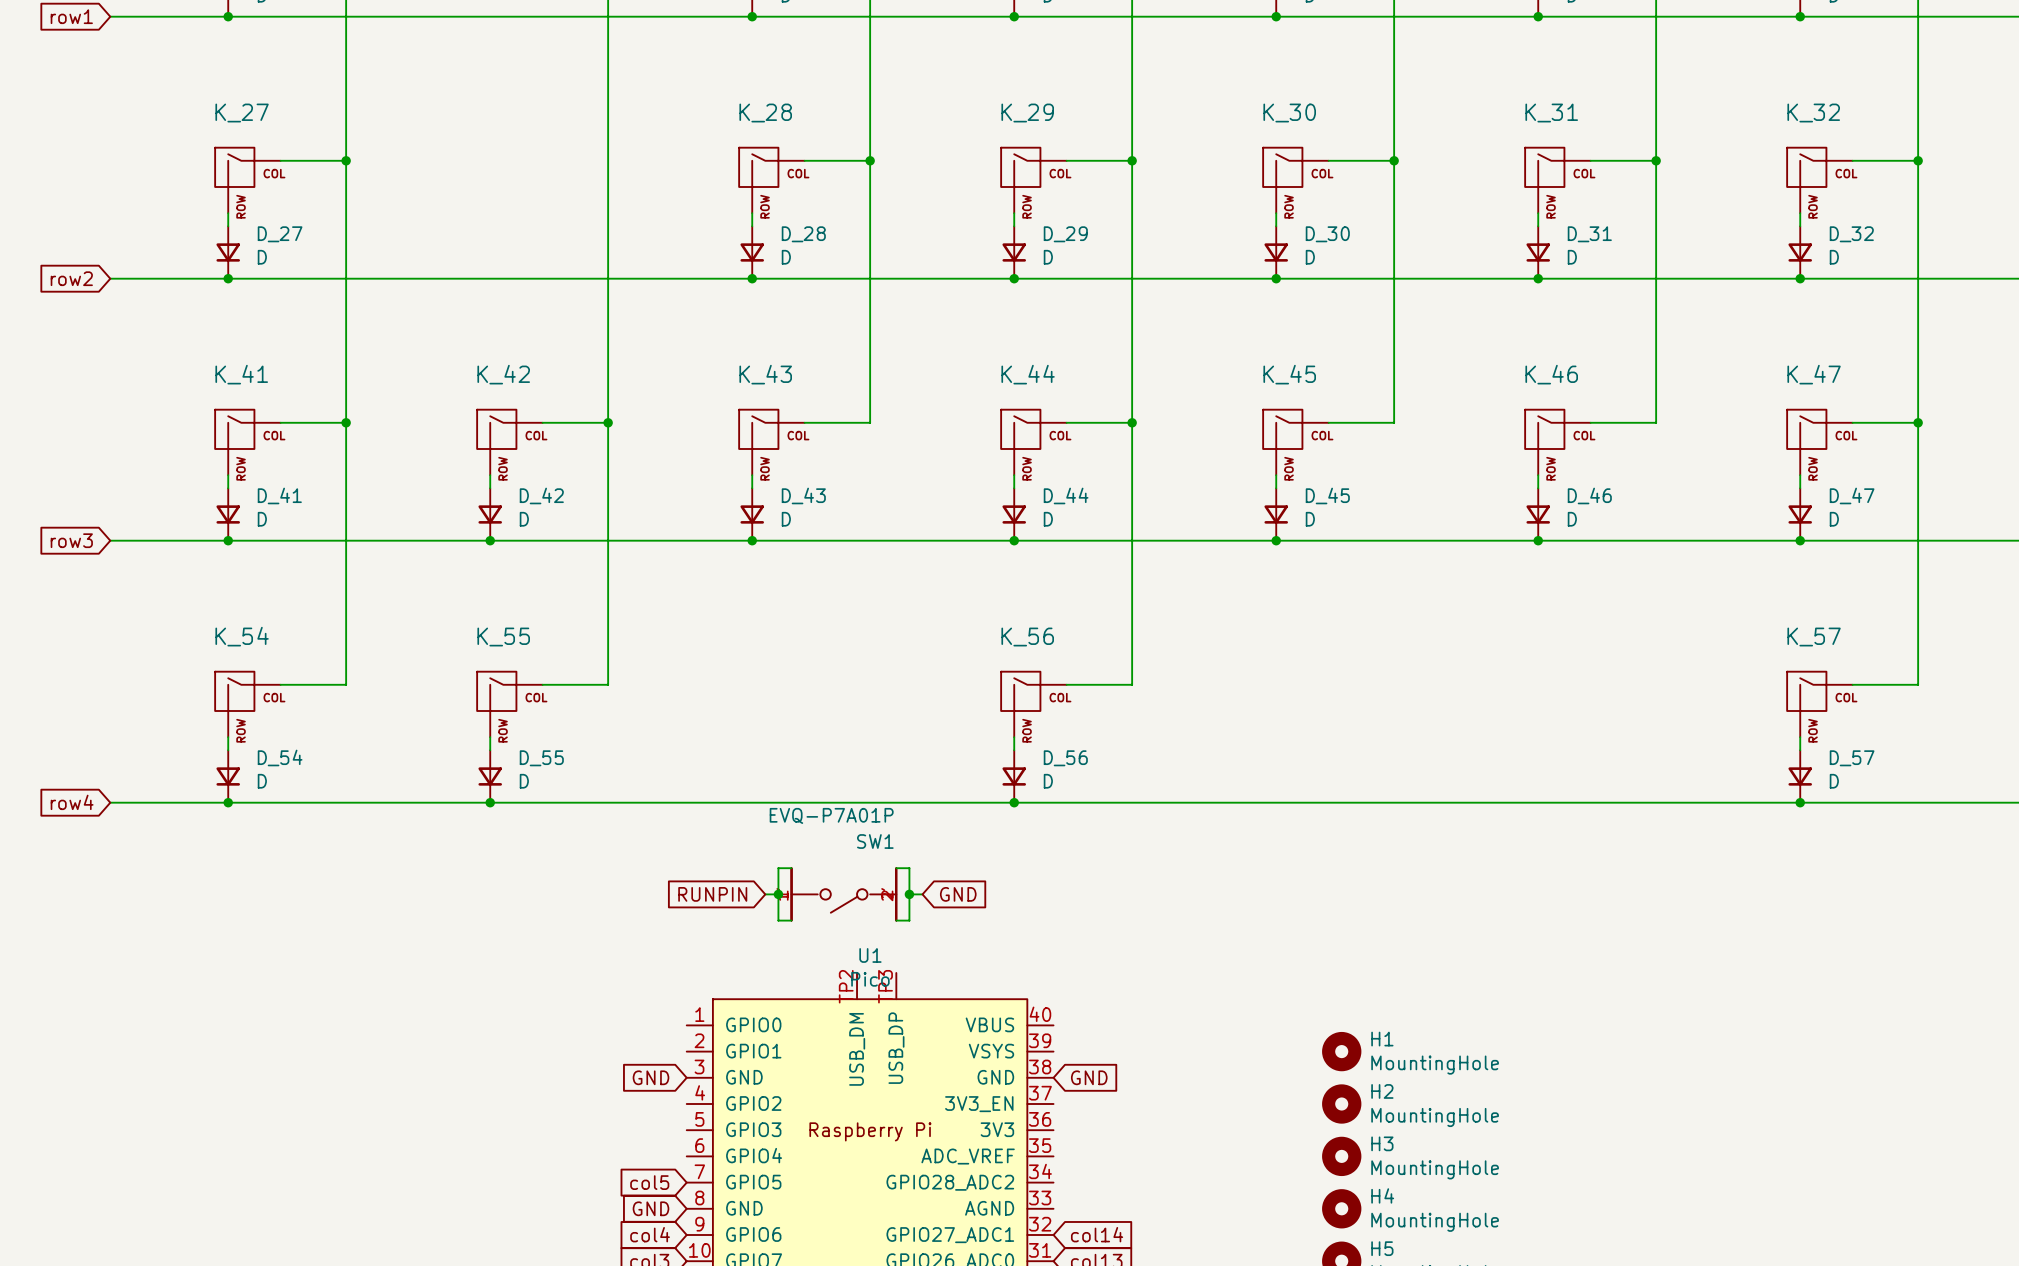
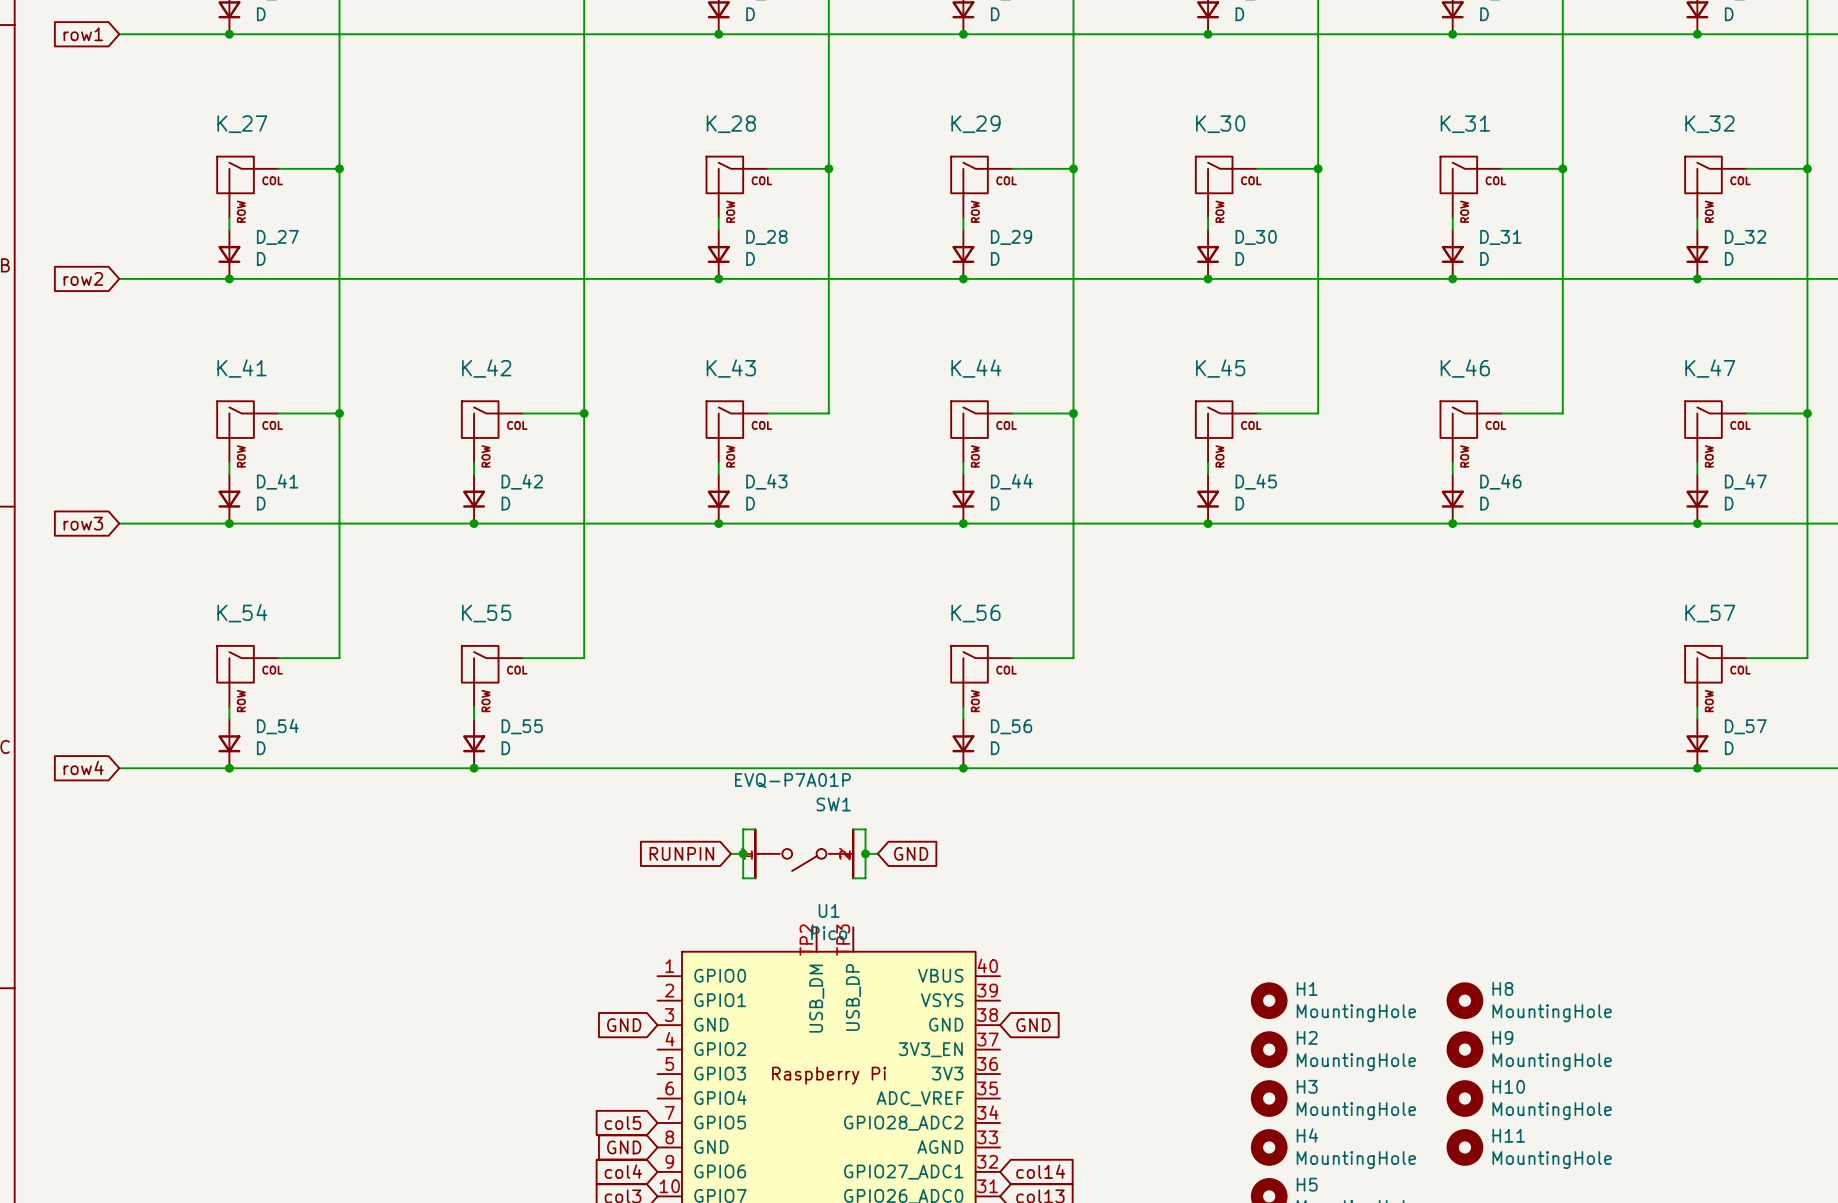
H8: none -> MountingHole (1464, 1000)
H9: none -> MountingHole (1464, 1049)
H10: none -> MountingHole (1464, 1098)
H11: none -> MountingHole (1464, 1147)

